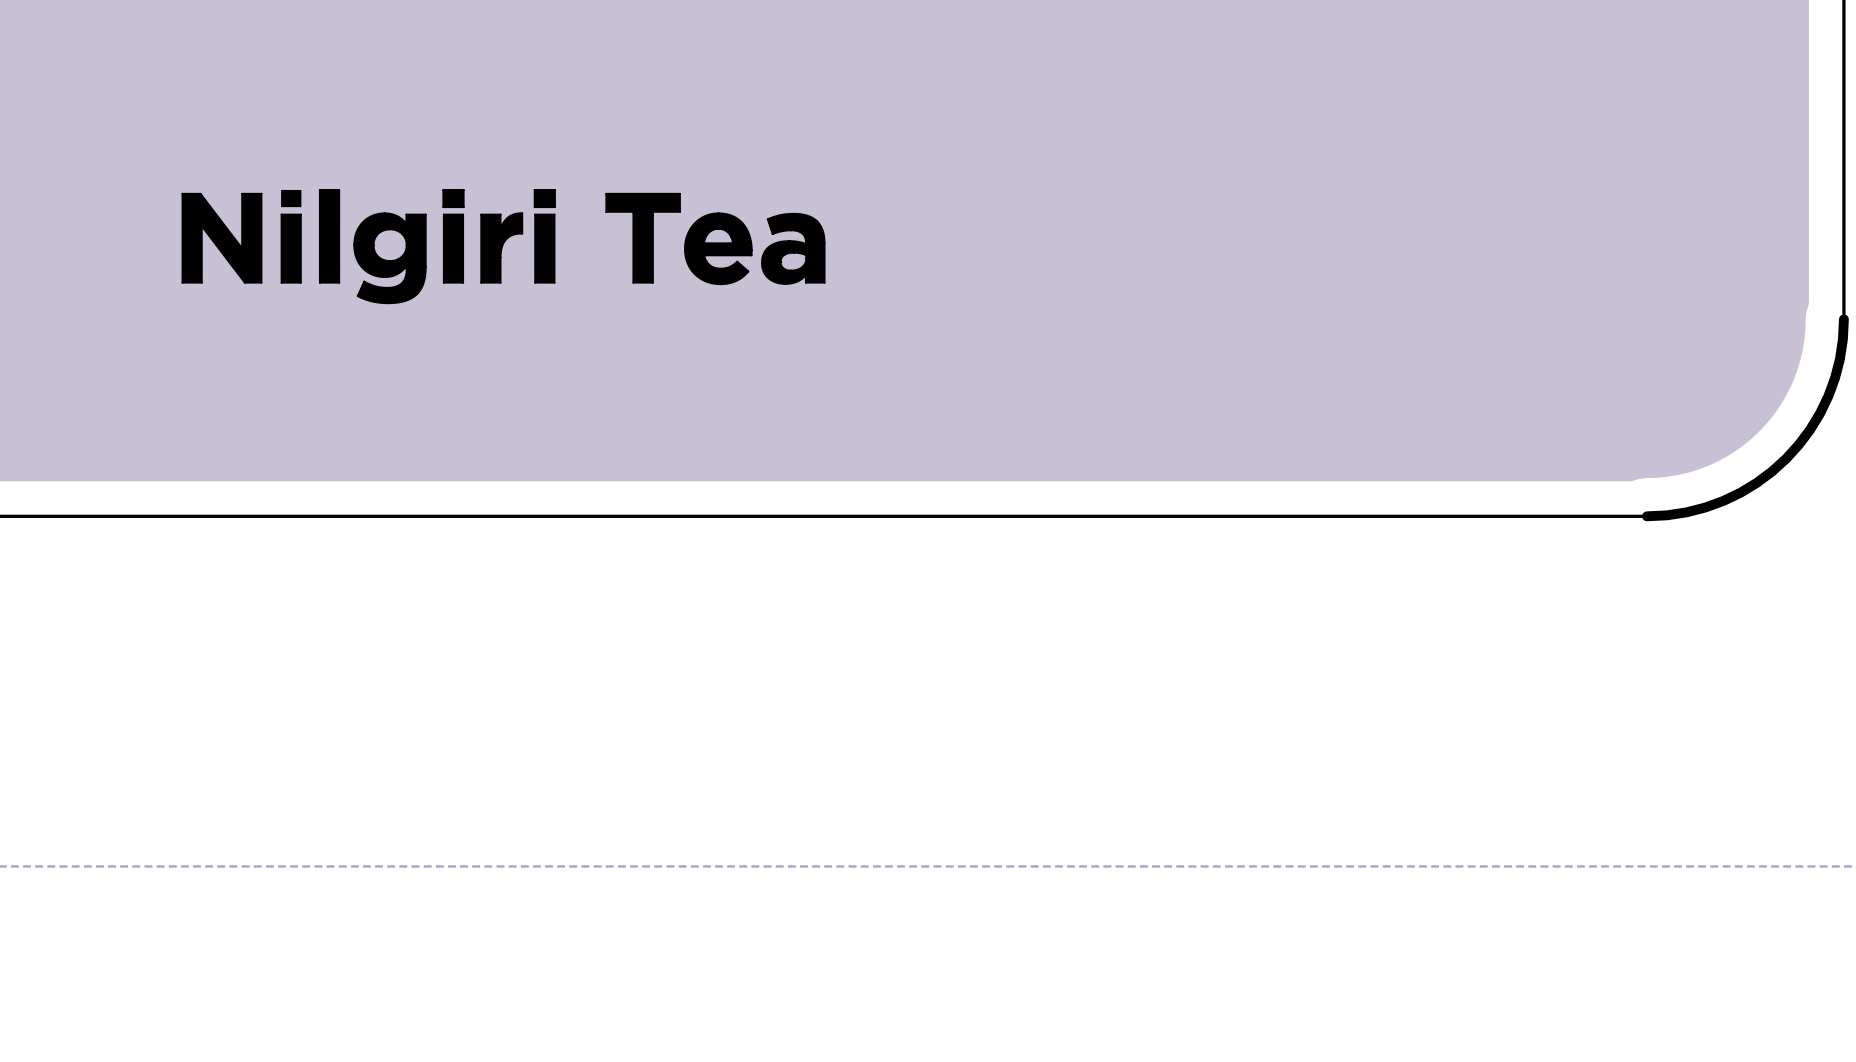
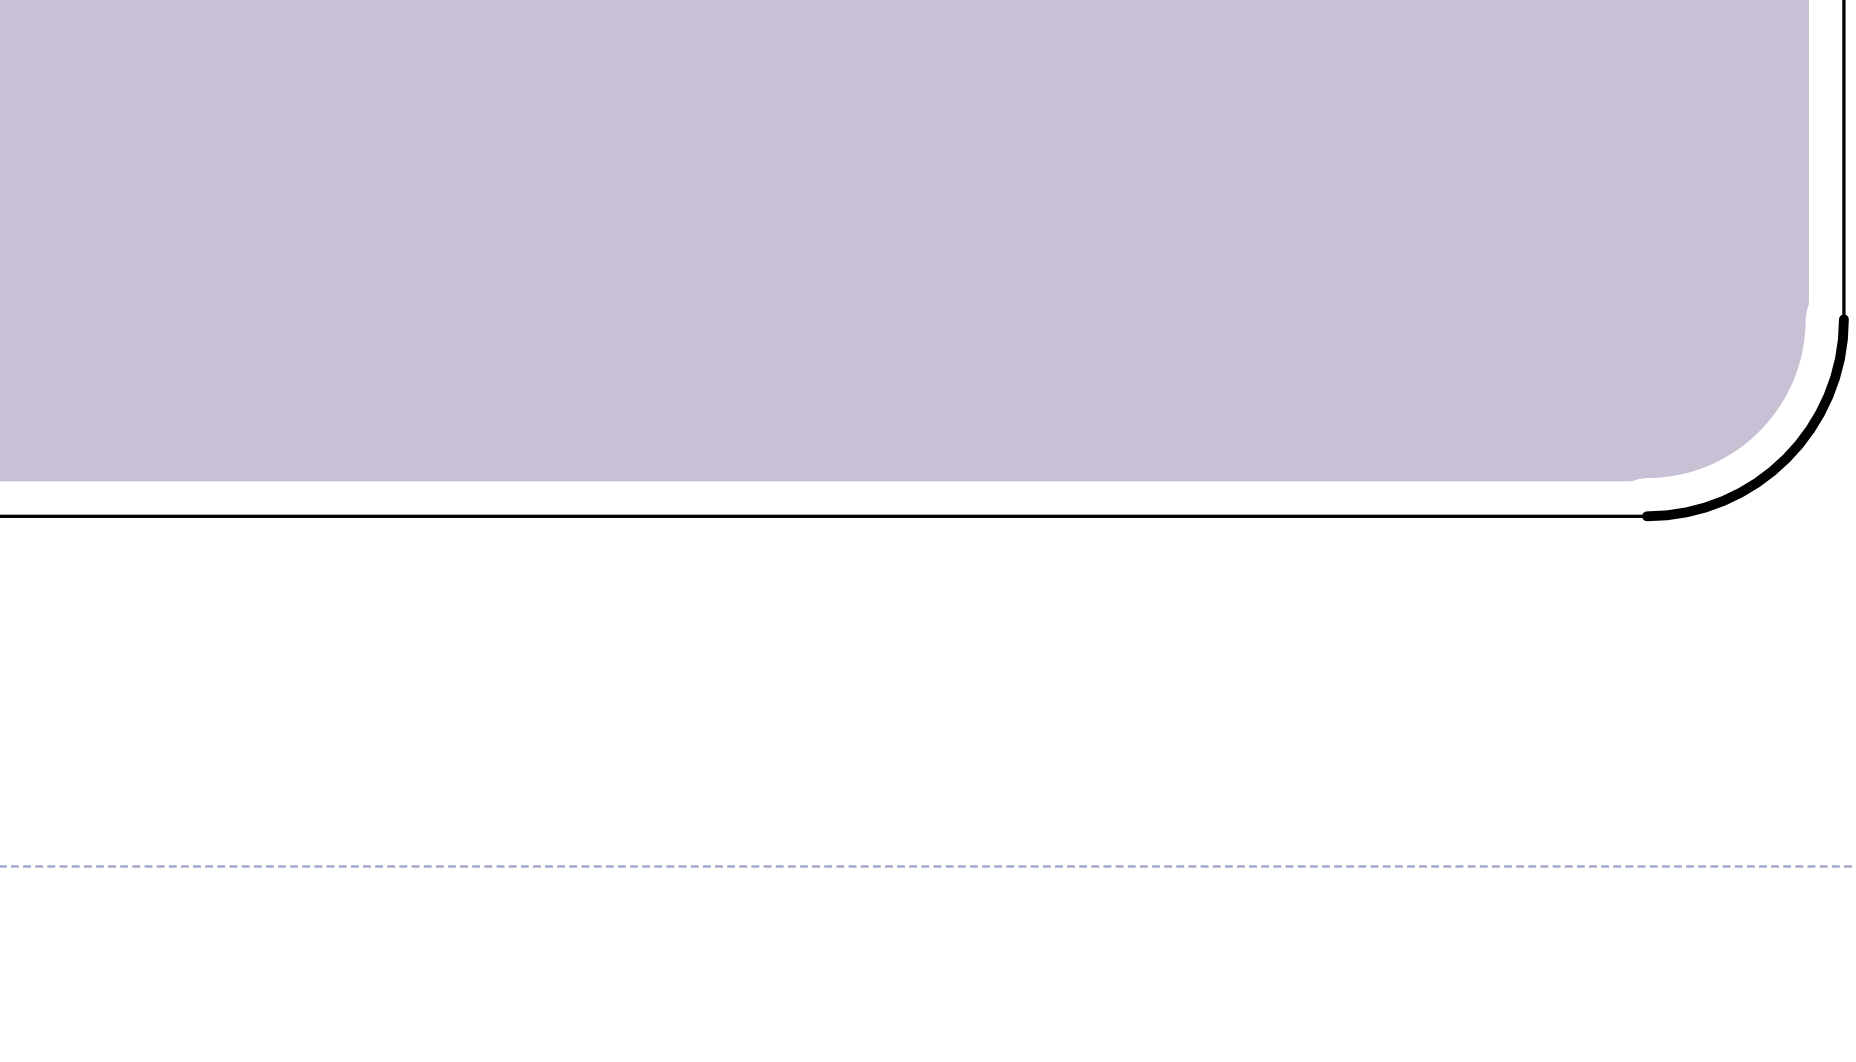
drawing: [182, 189, 825, 304] -> none

